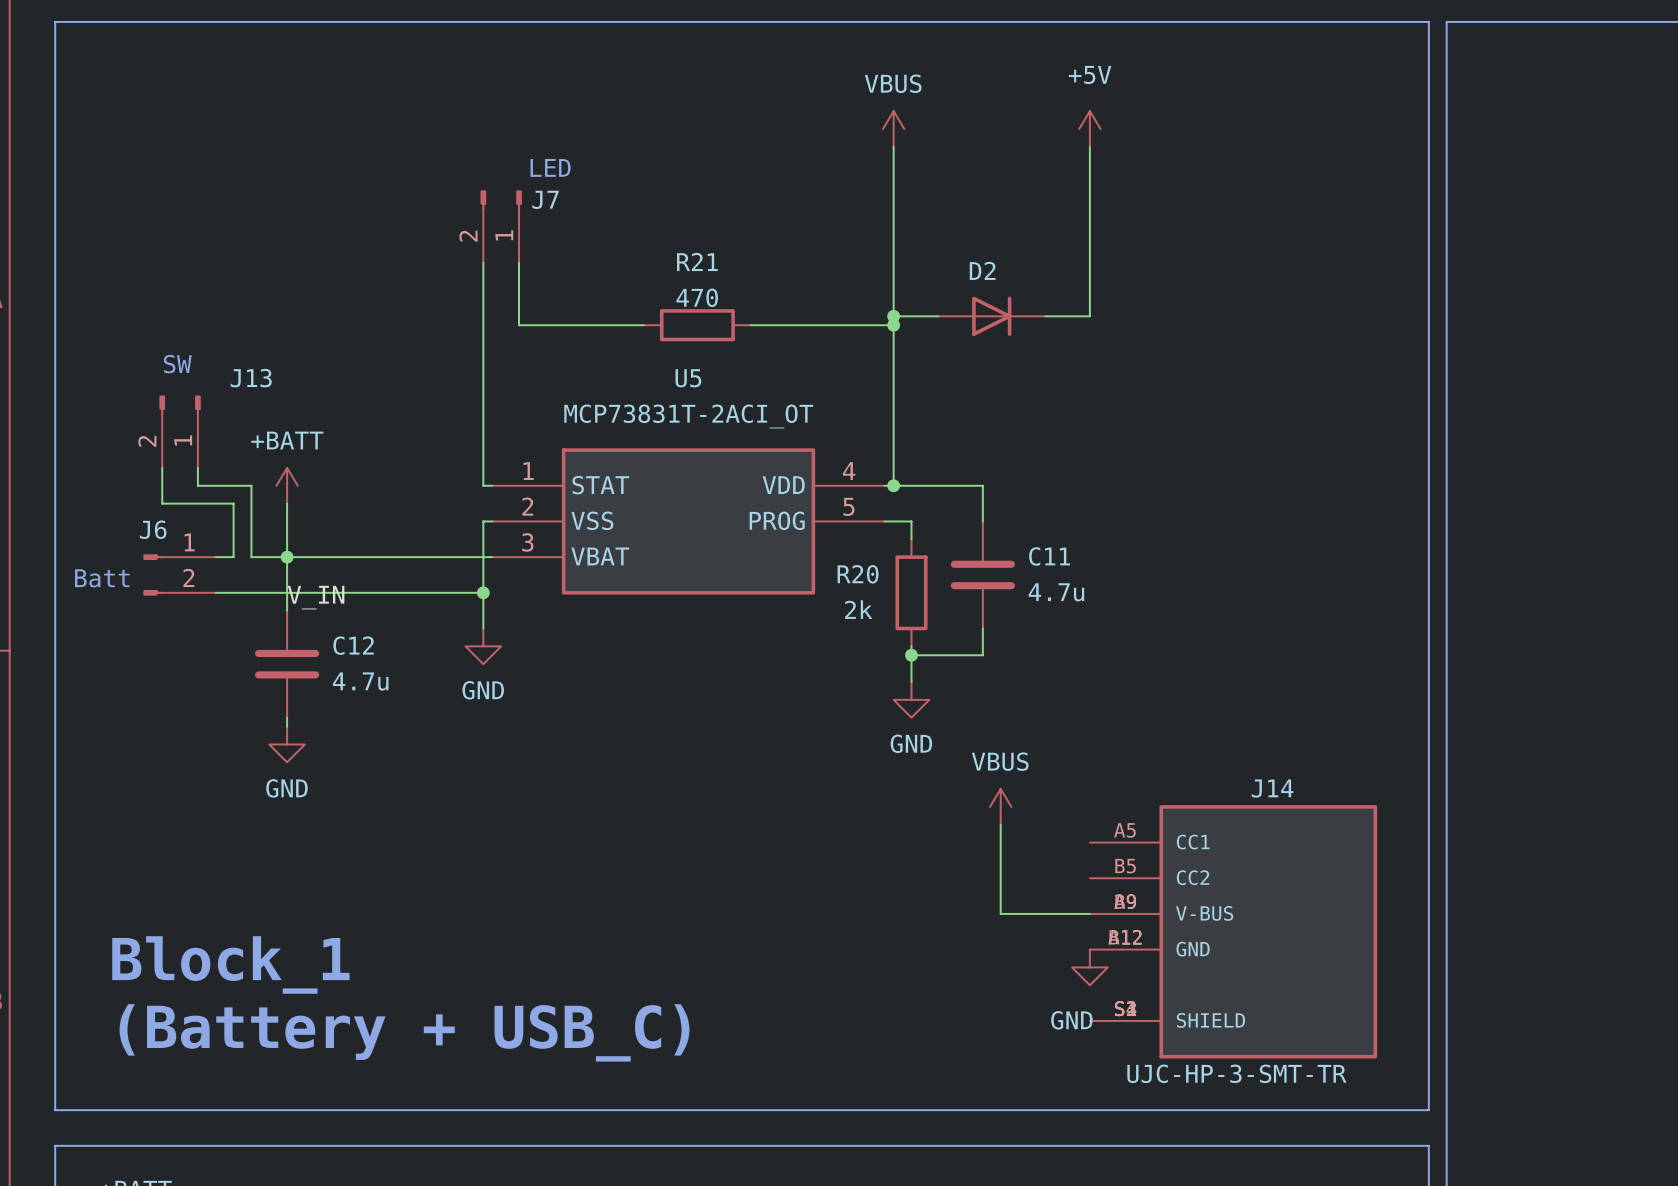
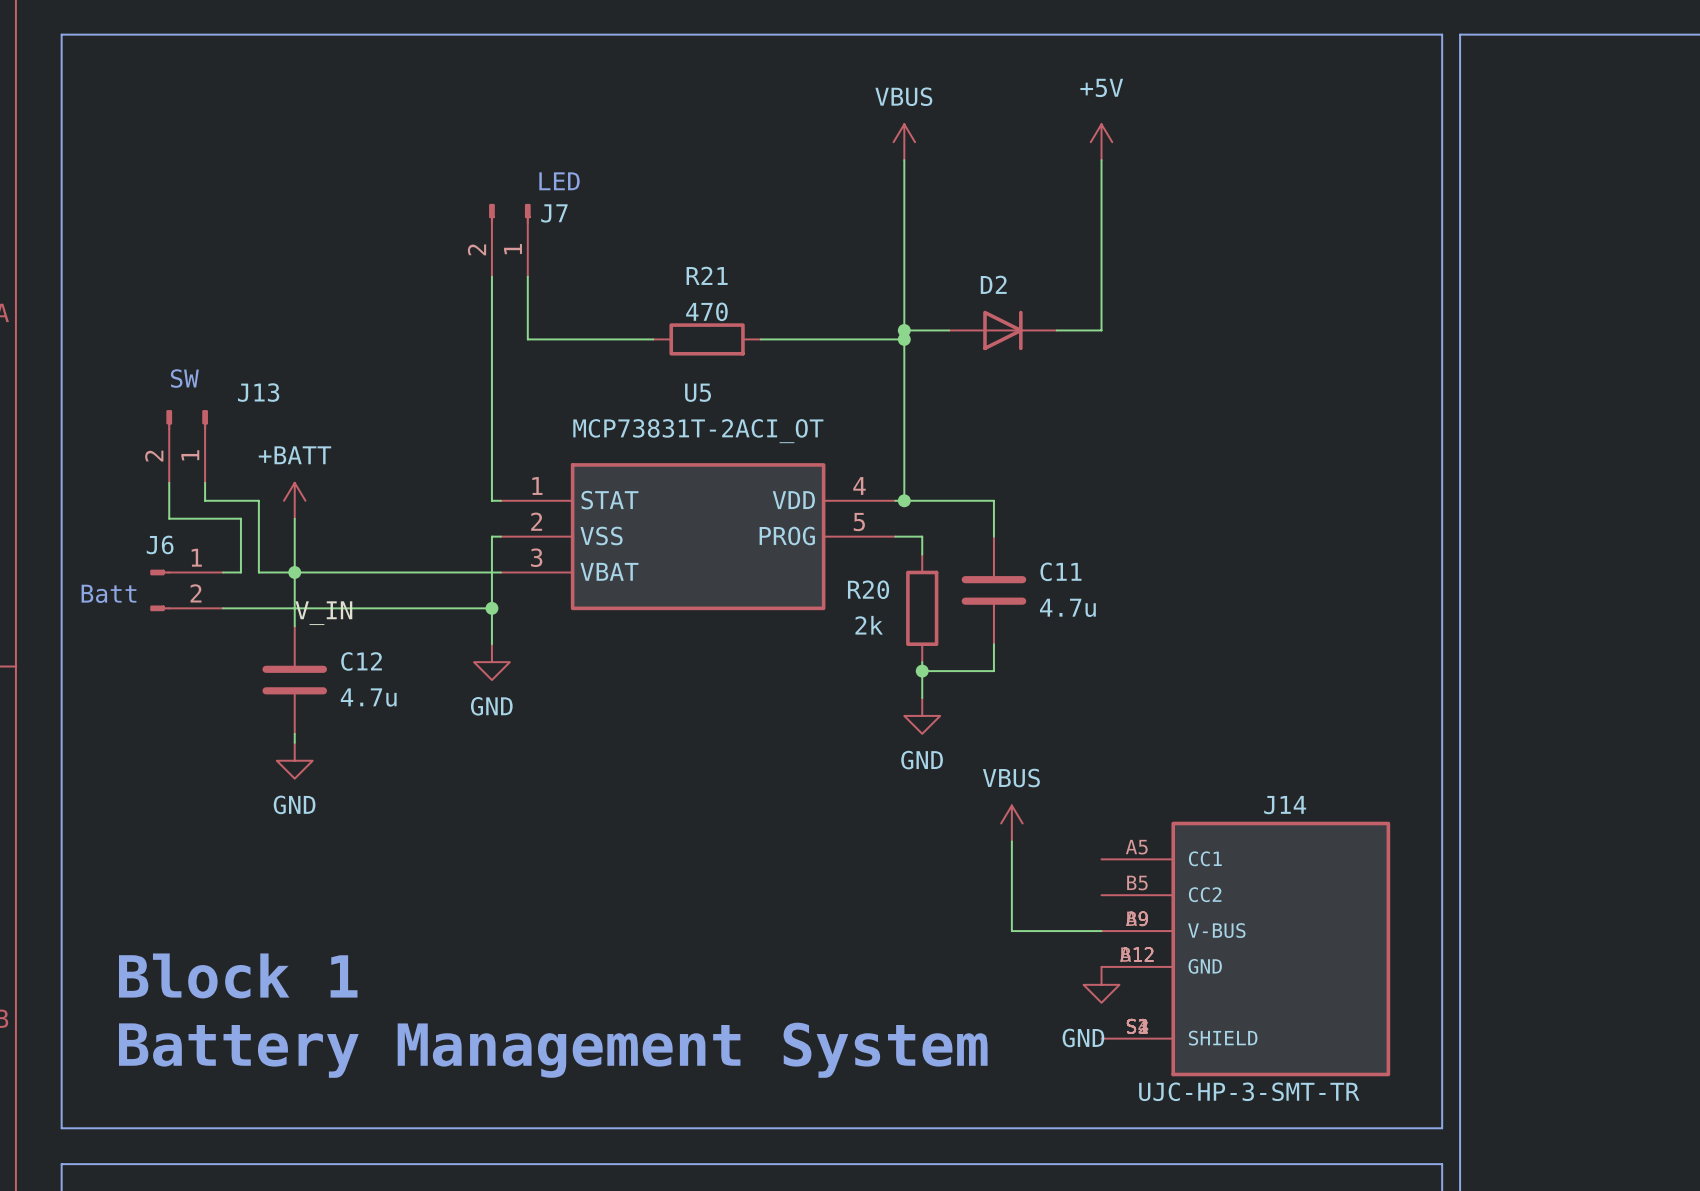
text: Block_1 (230, 964) -> Block 1 (238, 975)
text: (Battery + USB_C) (404, 1032) -> Battery Management System (553, 1050)

